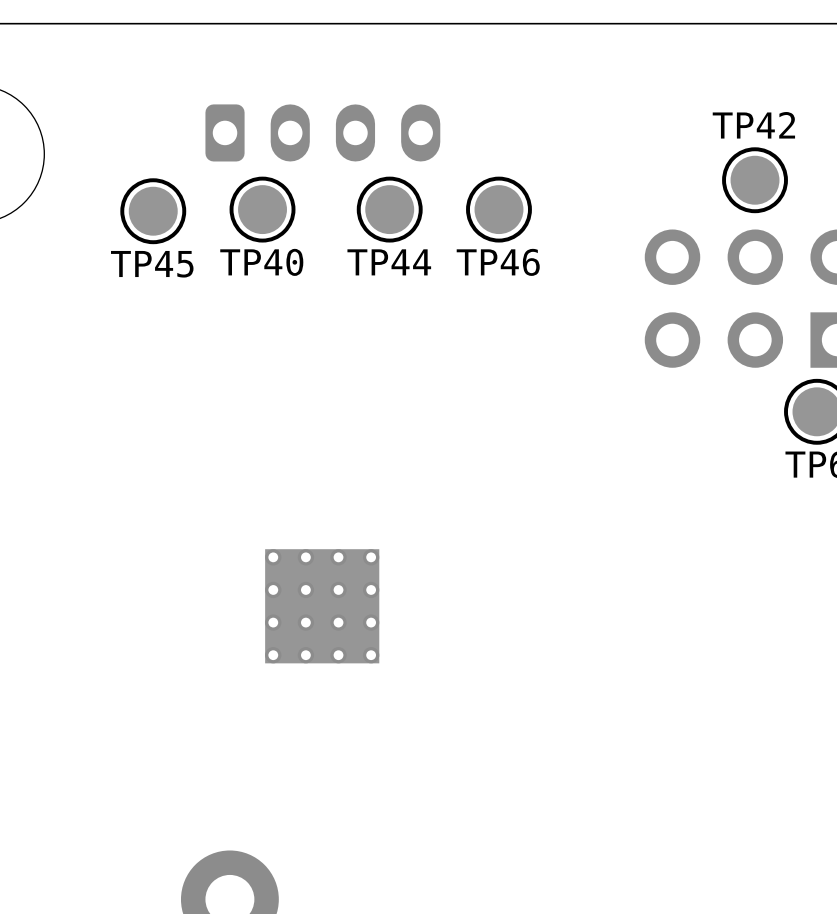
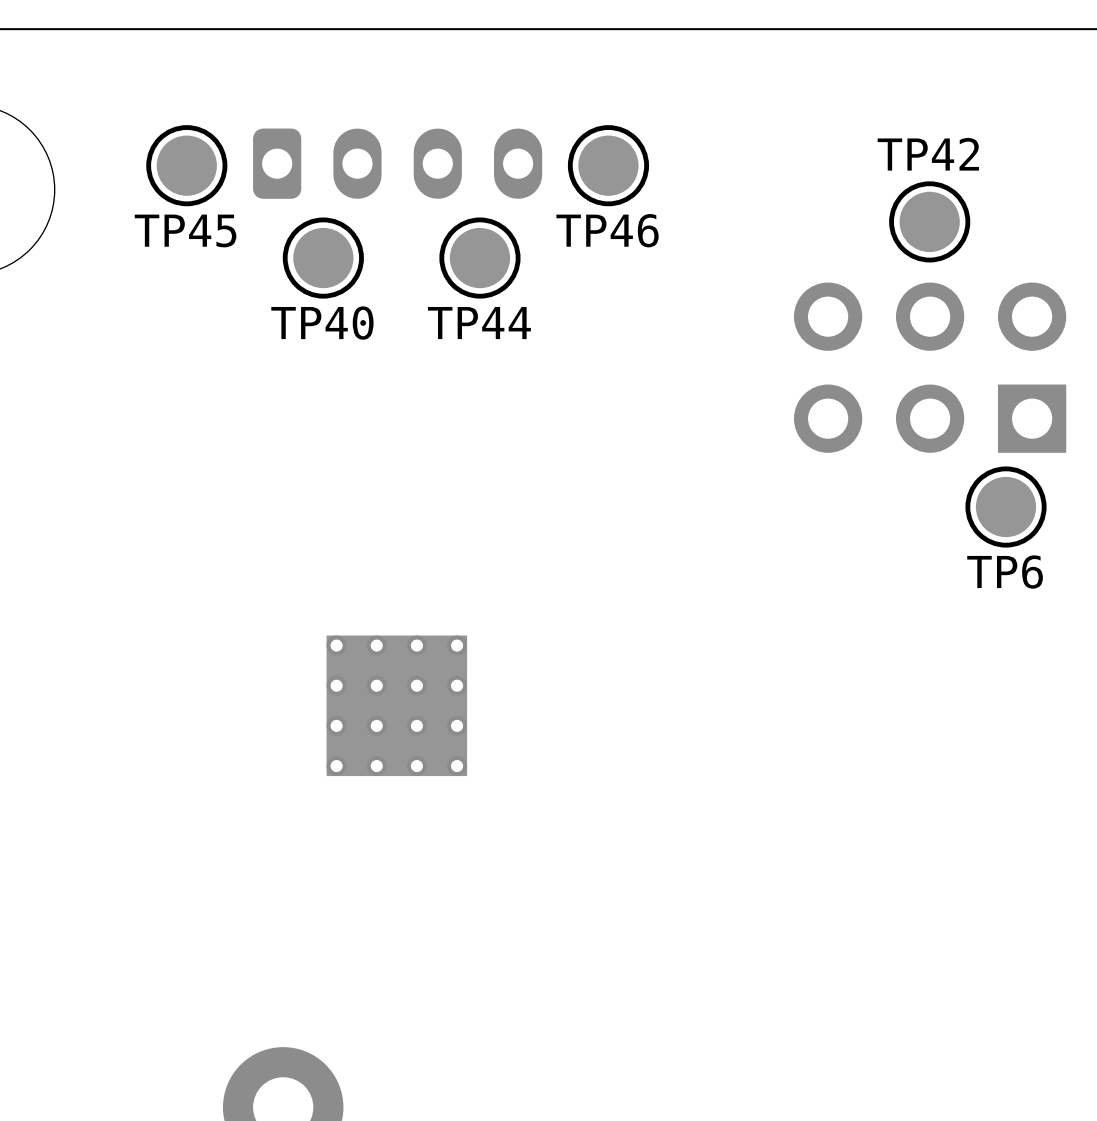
TP46 position: (498, 209) -> (608, 165)
TP45 position: (153, 211) -> (186, 165)
part position: (322, 606) -> (396, 705)

